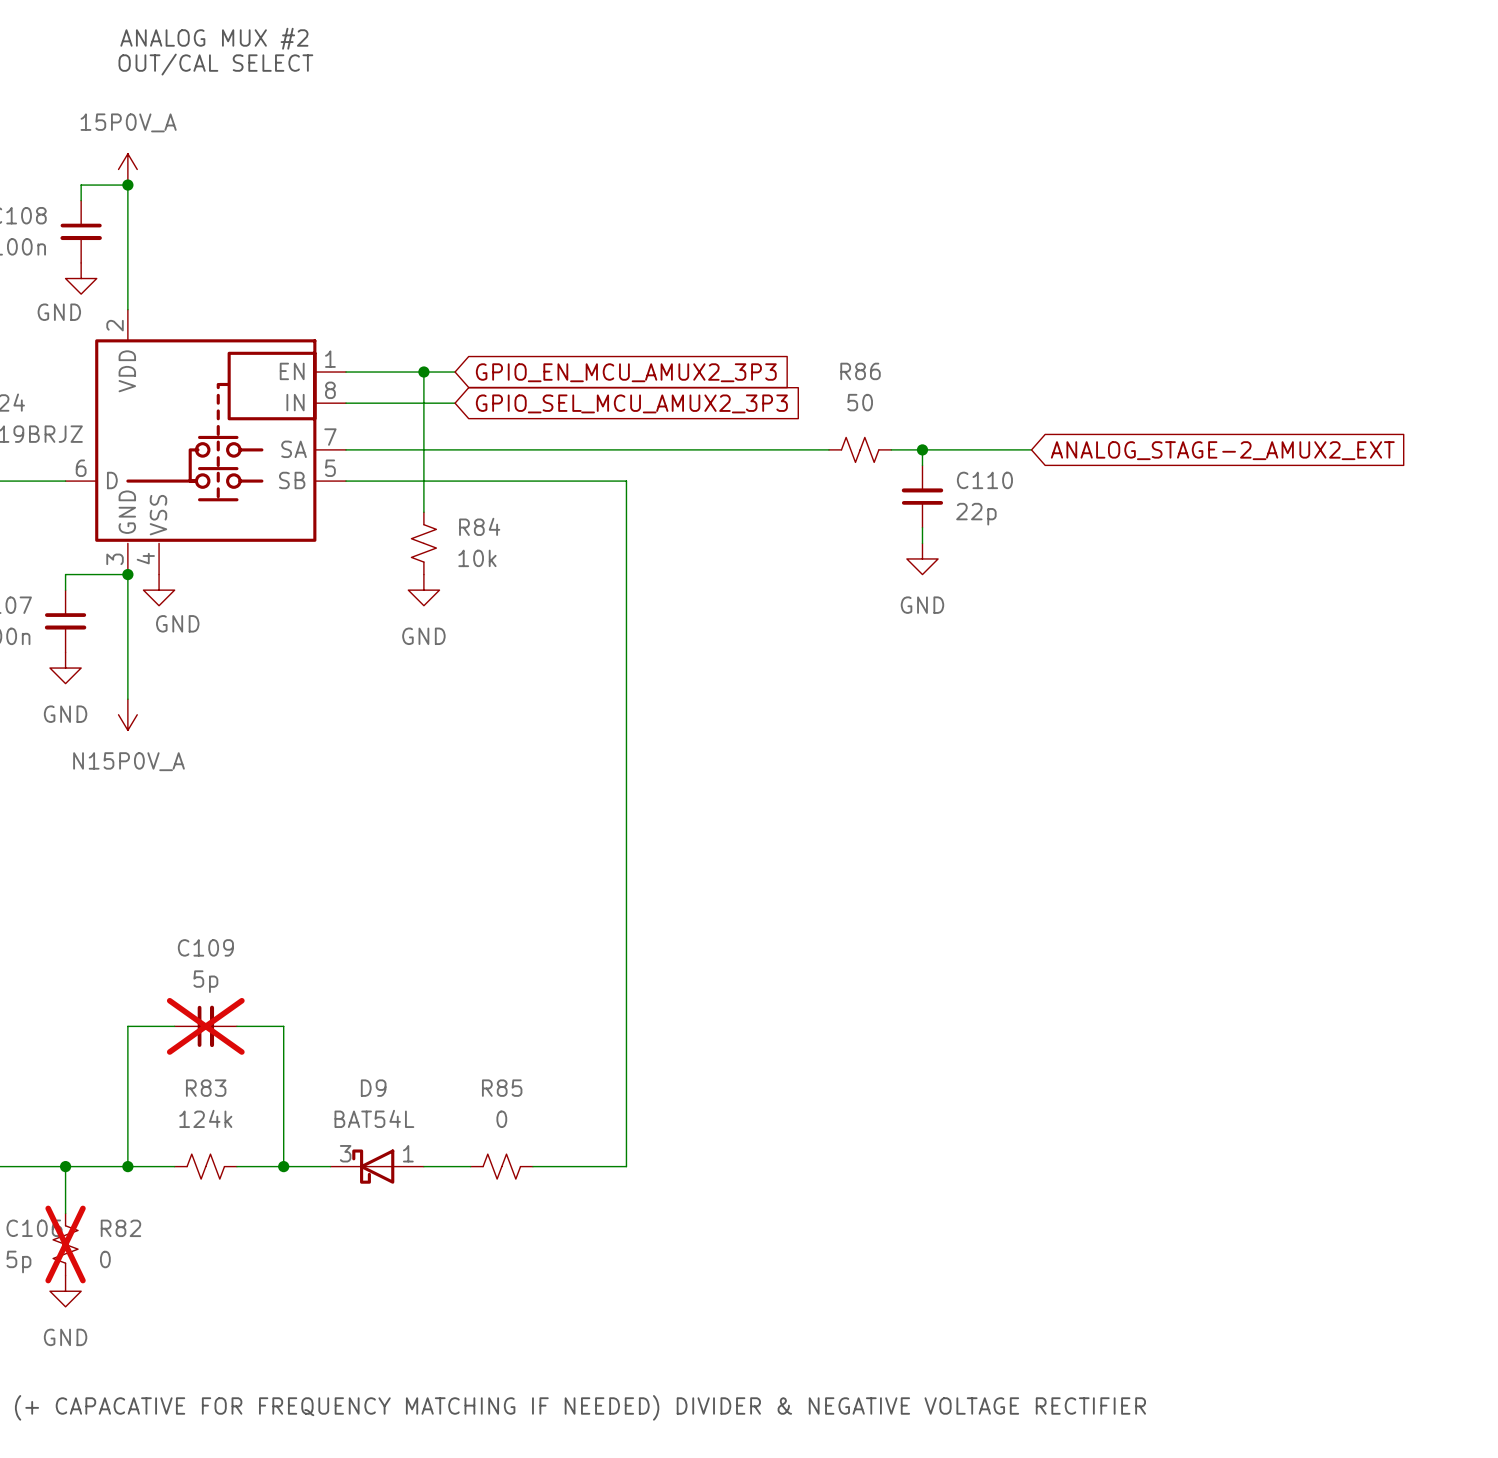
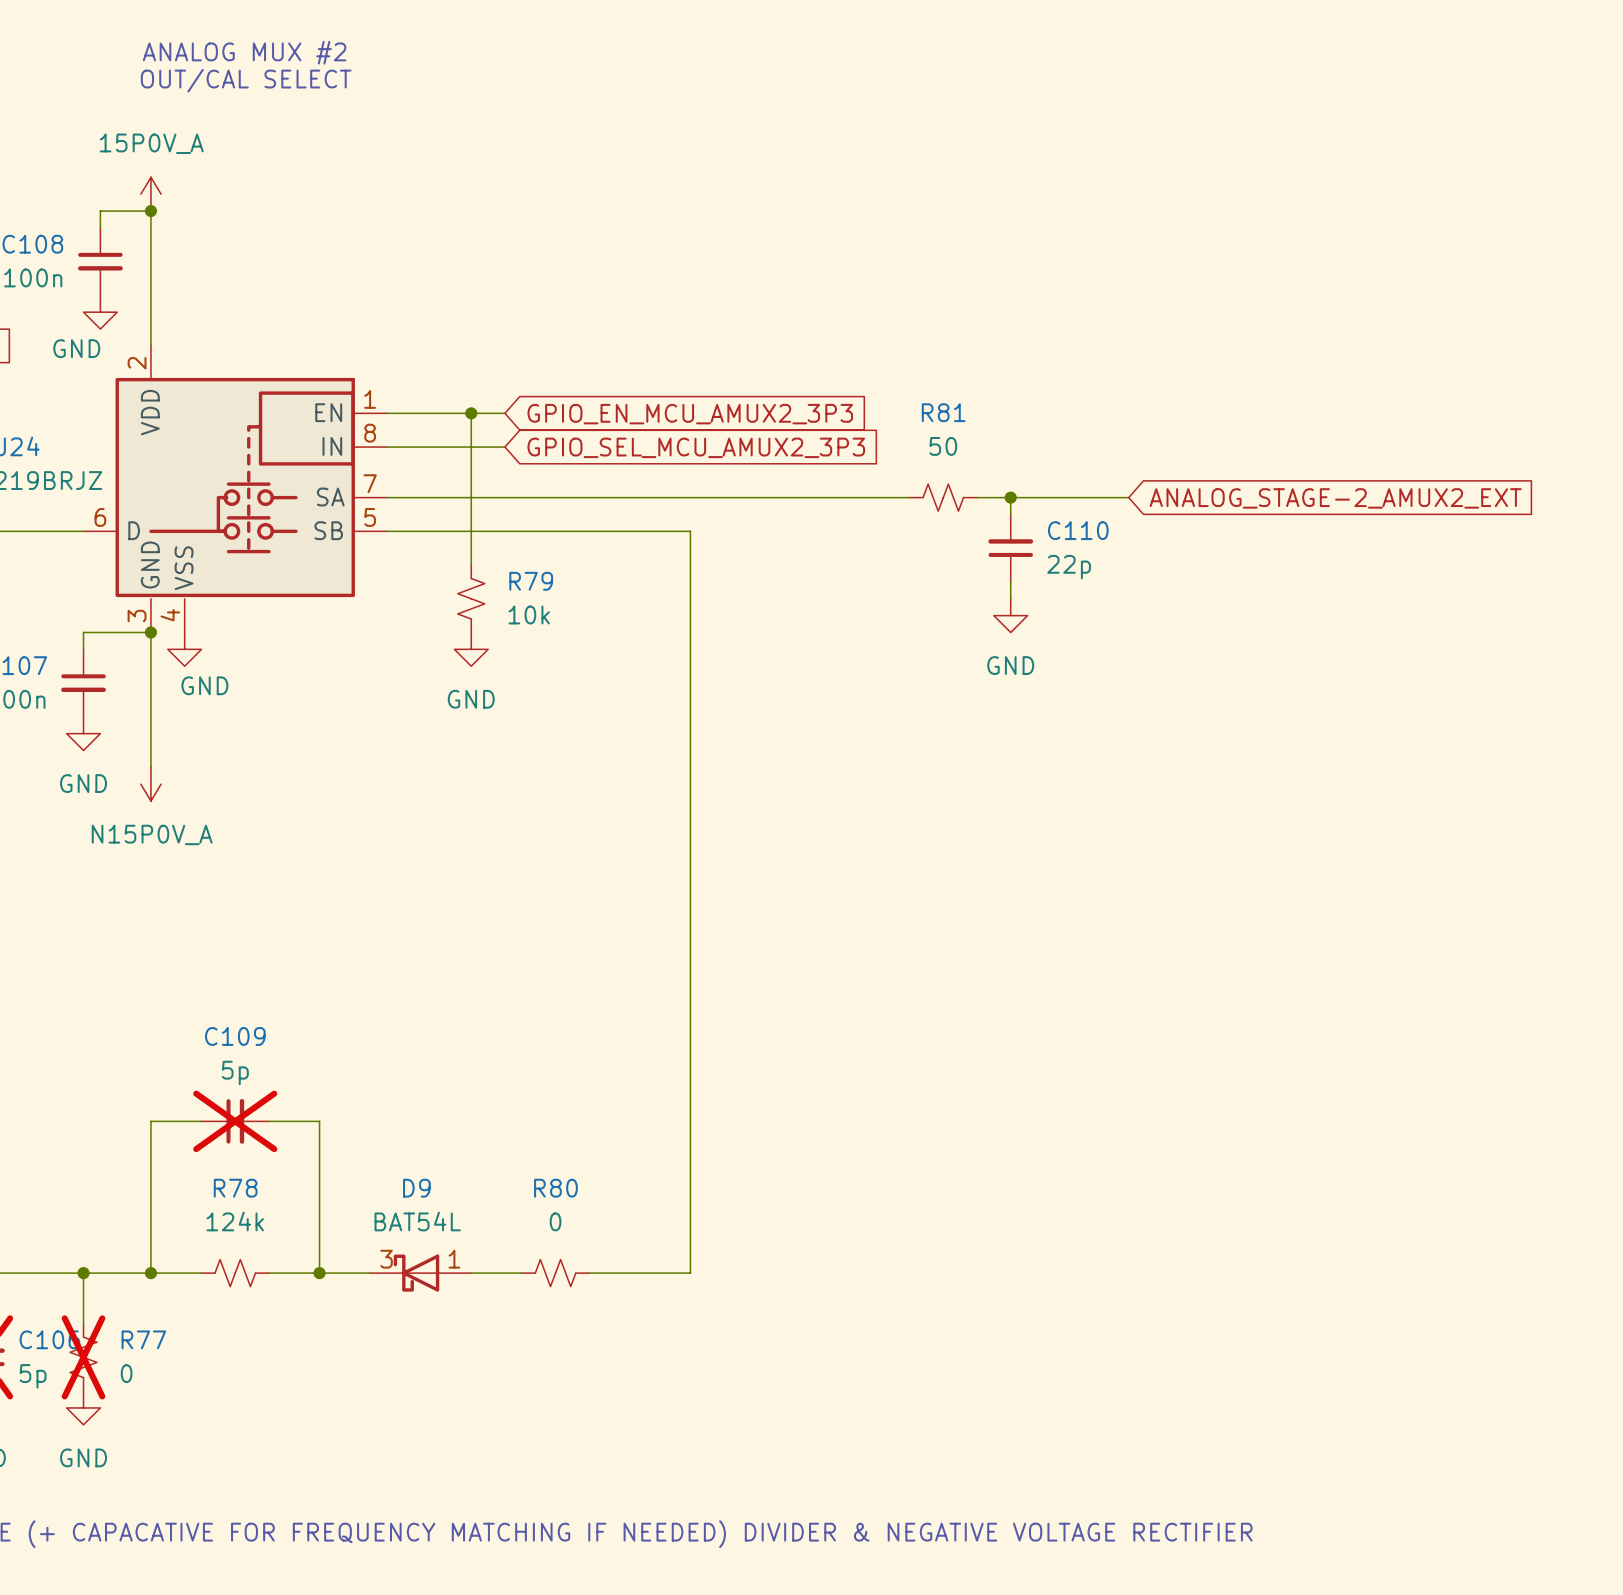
R86 name: R86 (860, 371) -> R81 (943, 412)
R84 name: R84 (479, 526) -> R79 (531, 581)
R83 name: R83 (206, 1088) -> R78 (235, 1188)
R85 name: R85 (502, 1088) -> R80 (555, 1188)
R82 name: R82 (120, 1228) -> R77 (143, 1339)

